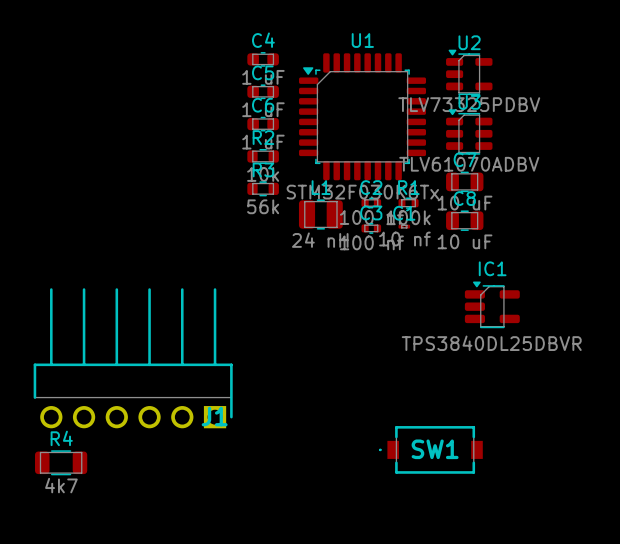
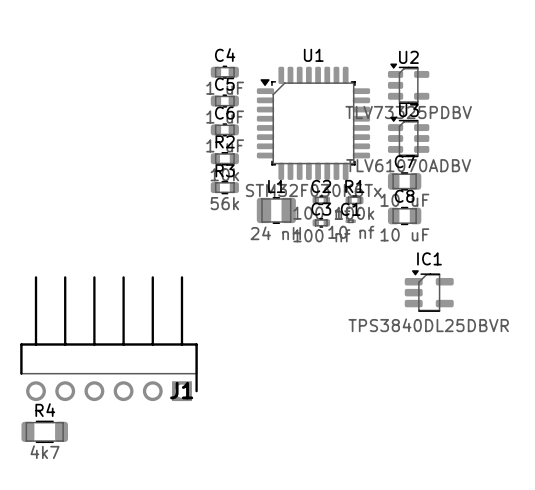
SW1: (430, 449) -> none

